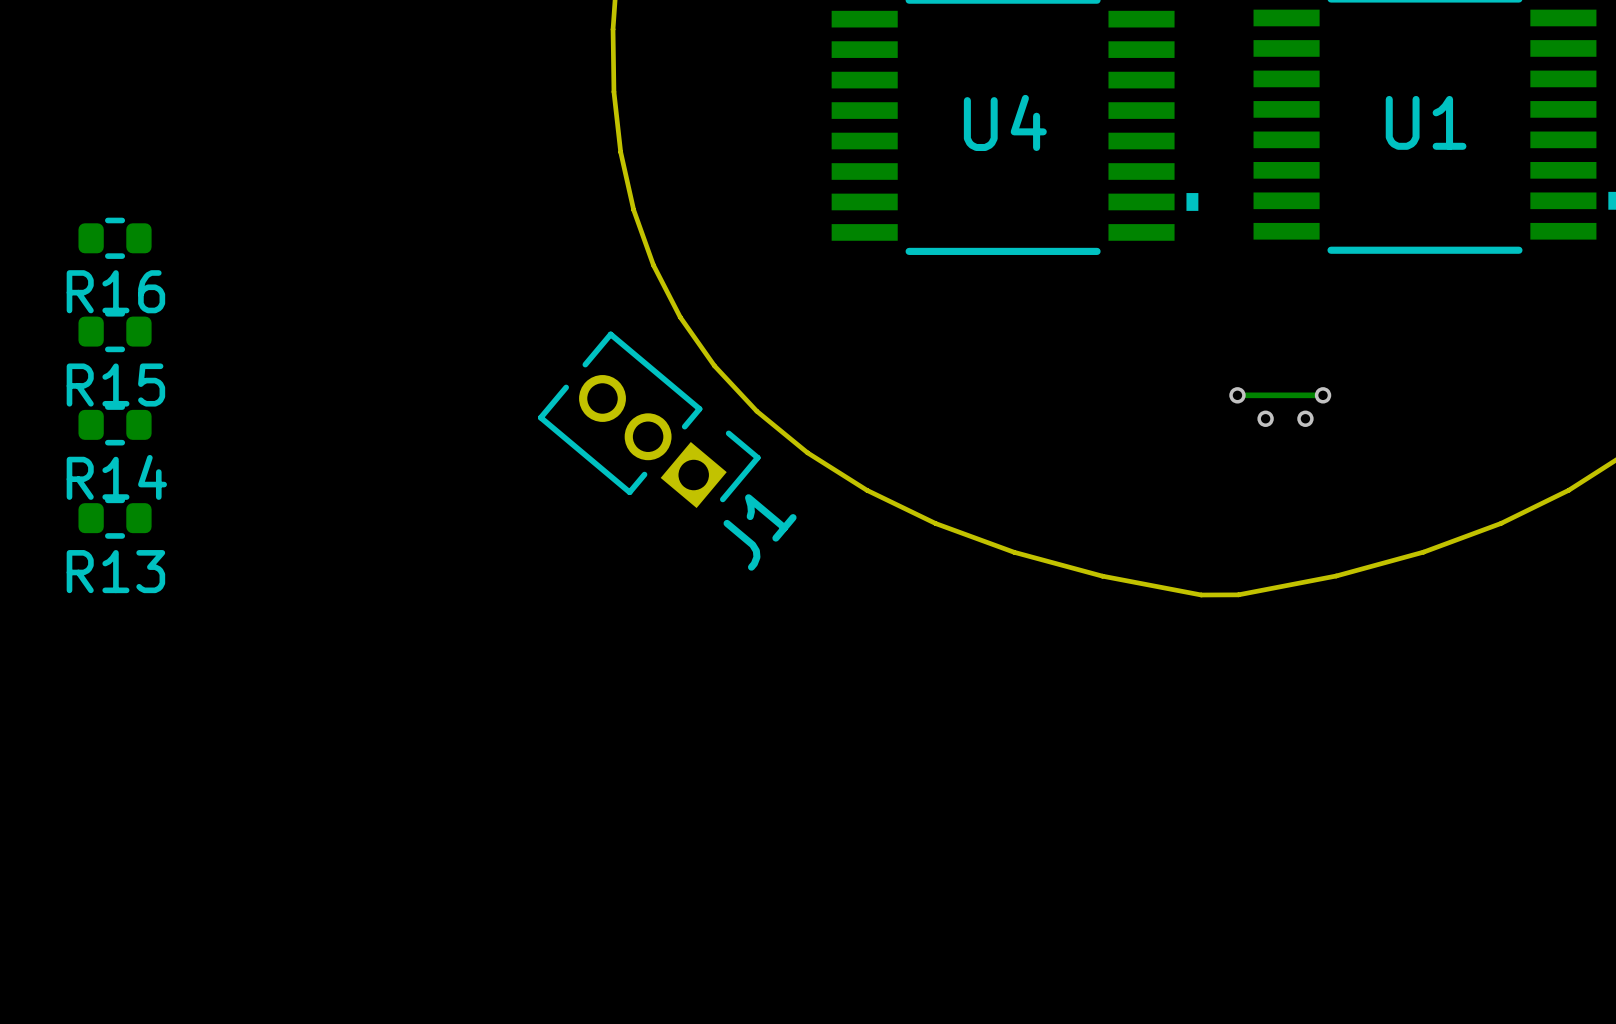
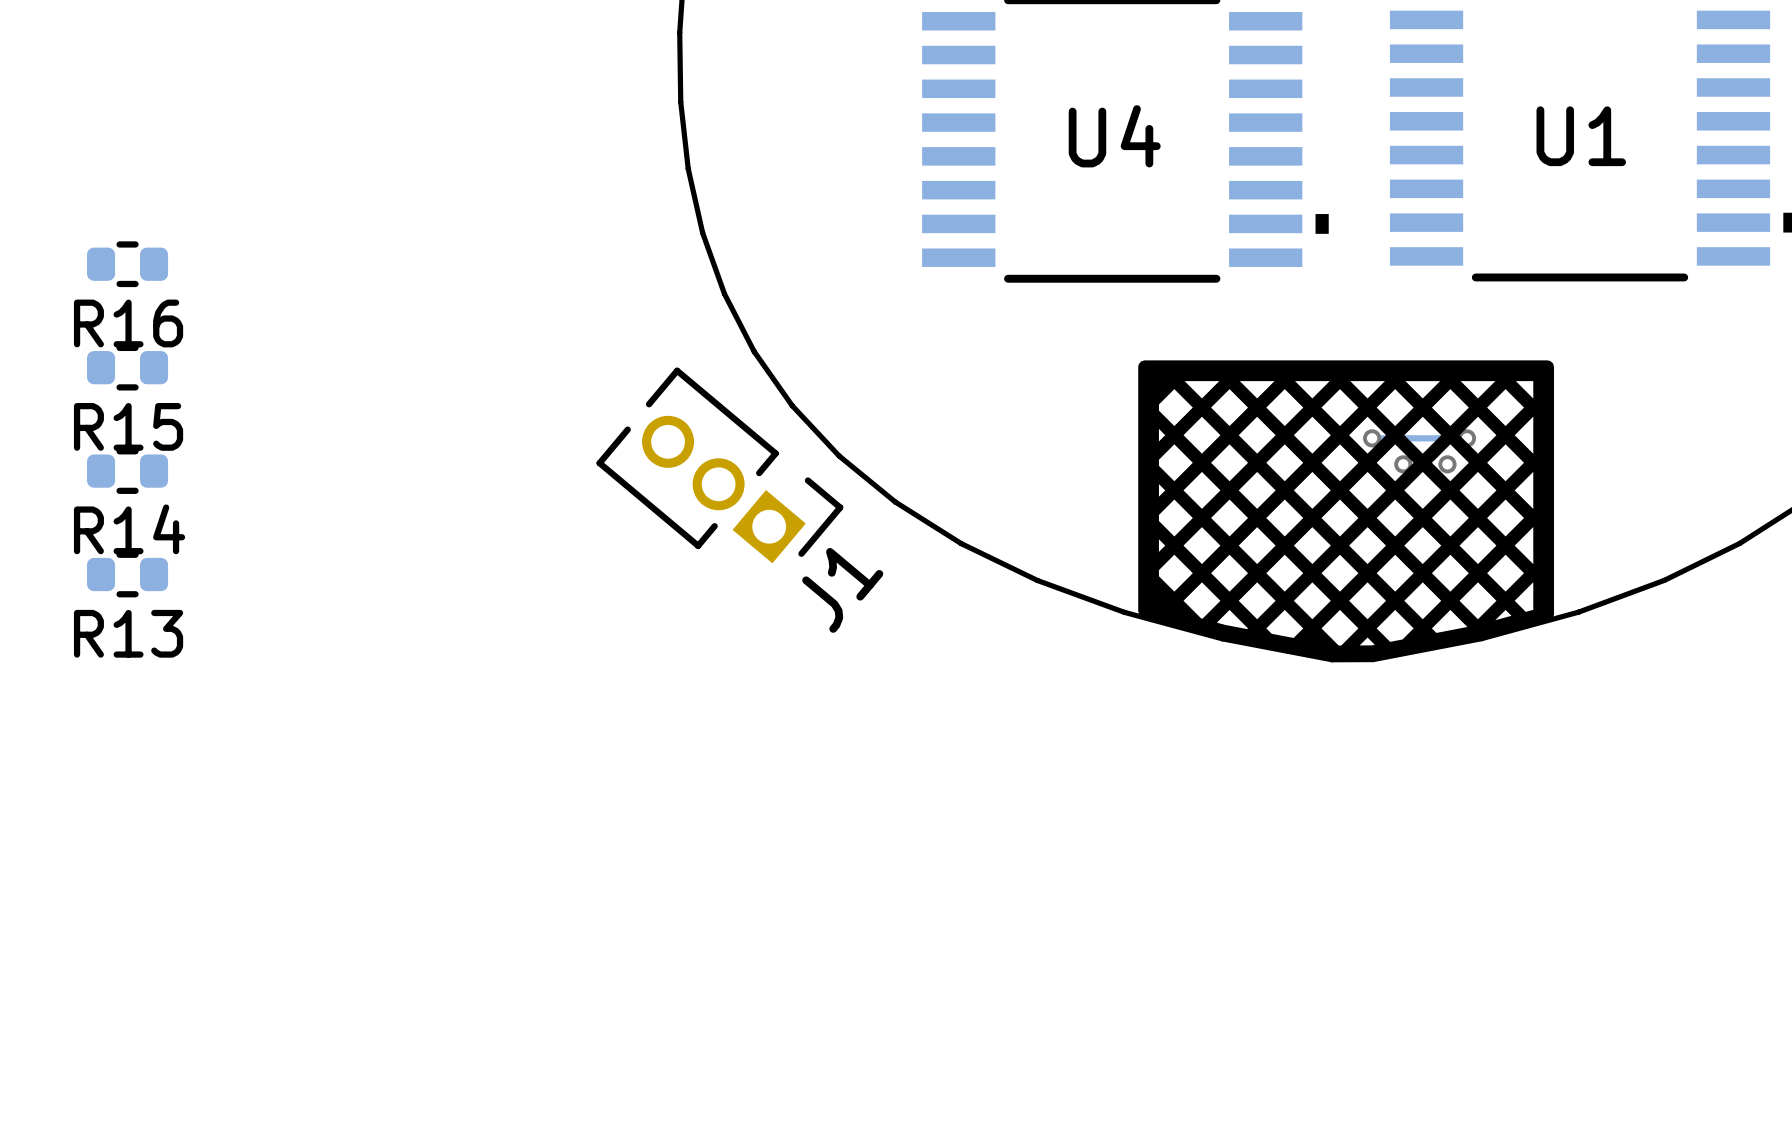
drawing: none -> [1138, 360, 1555, 660]

